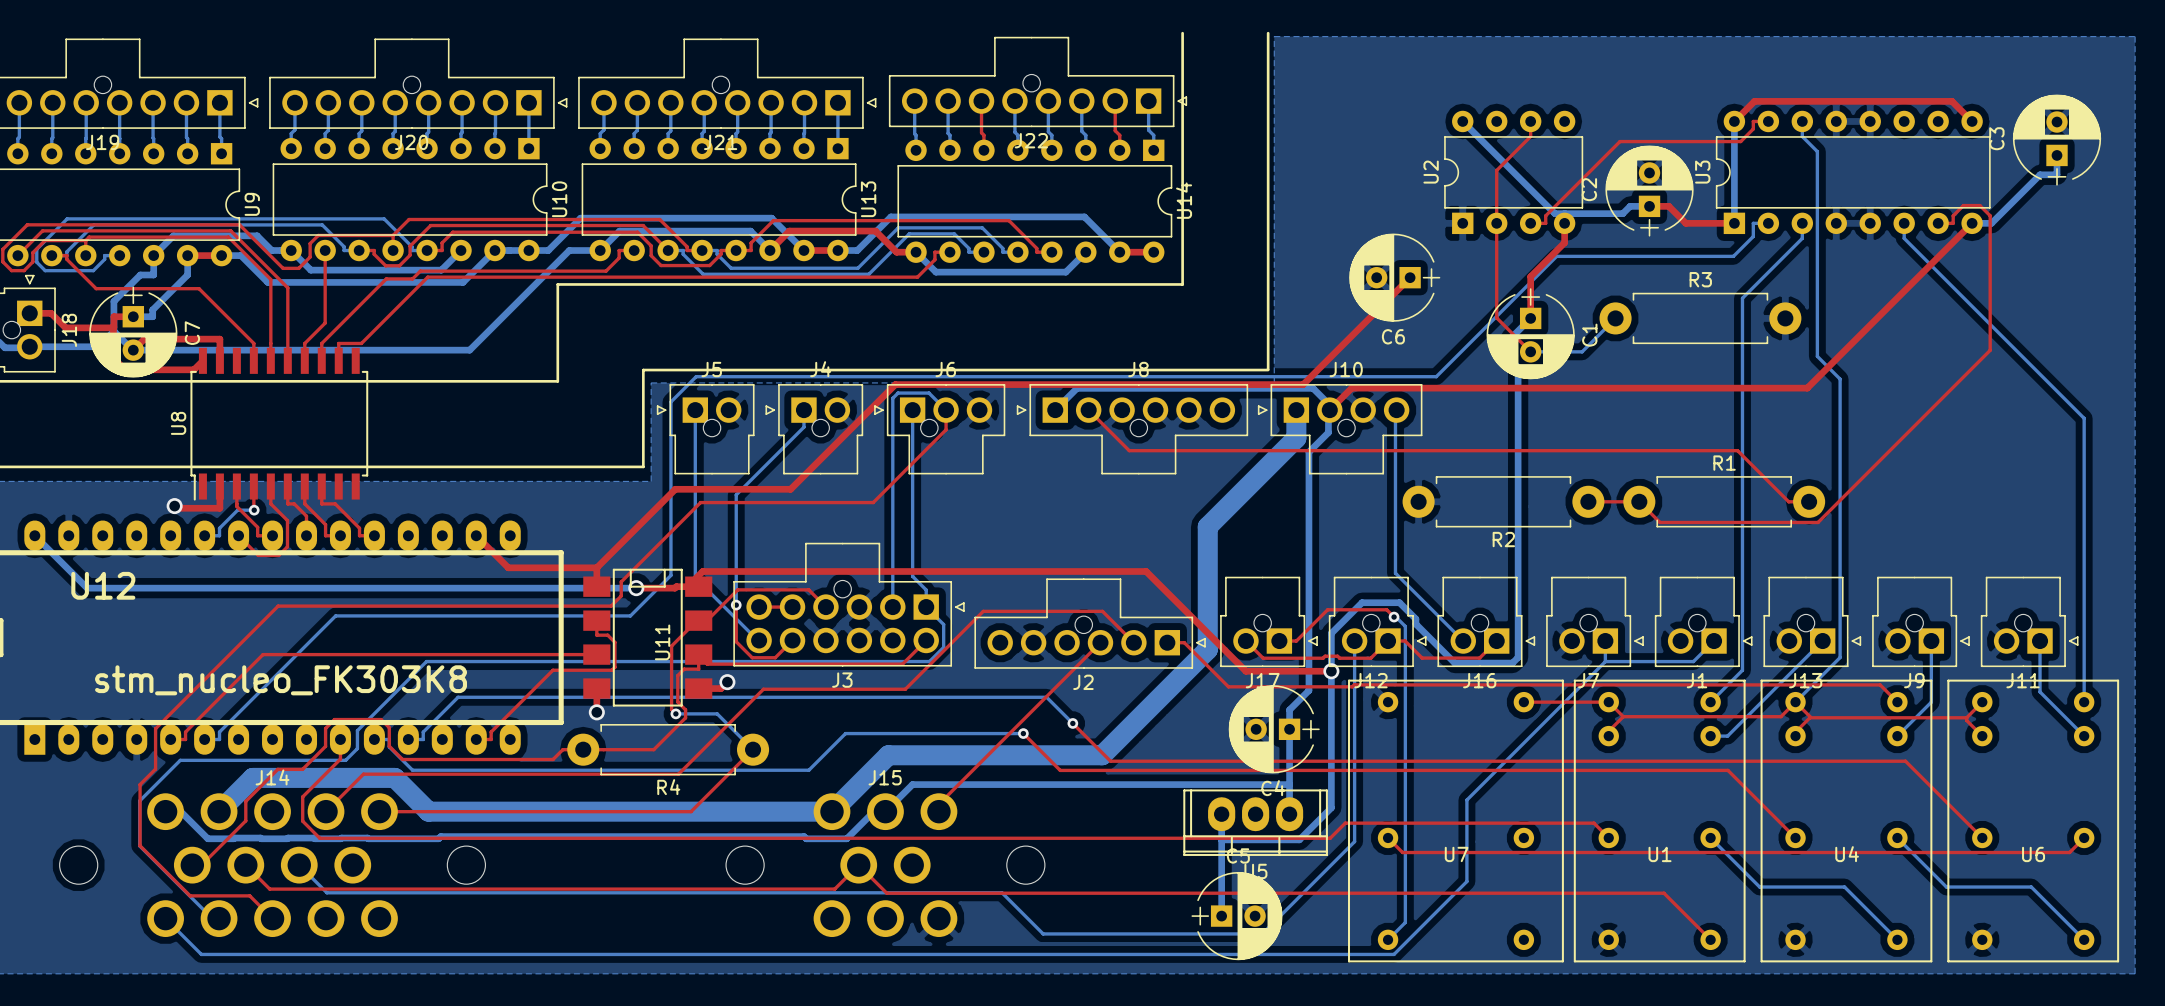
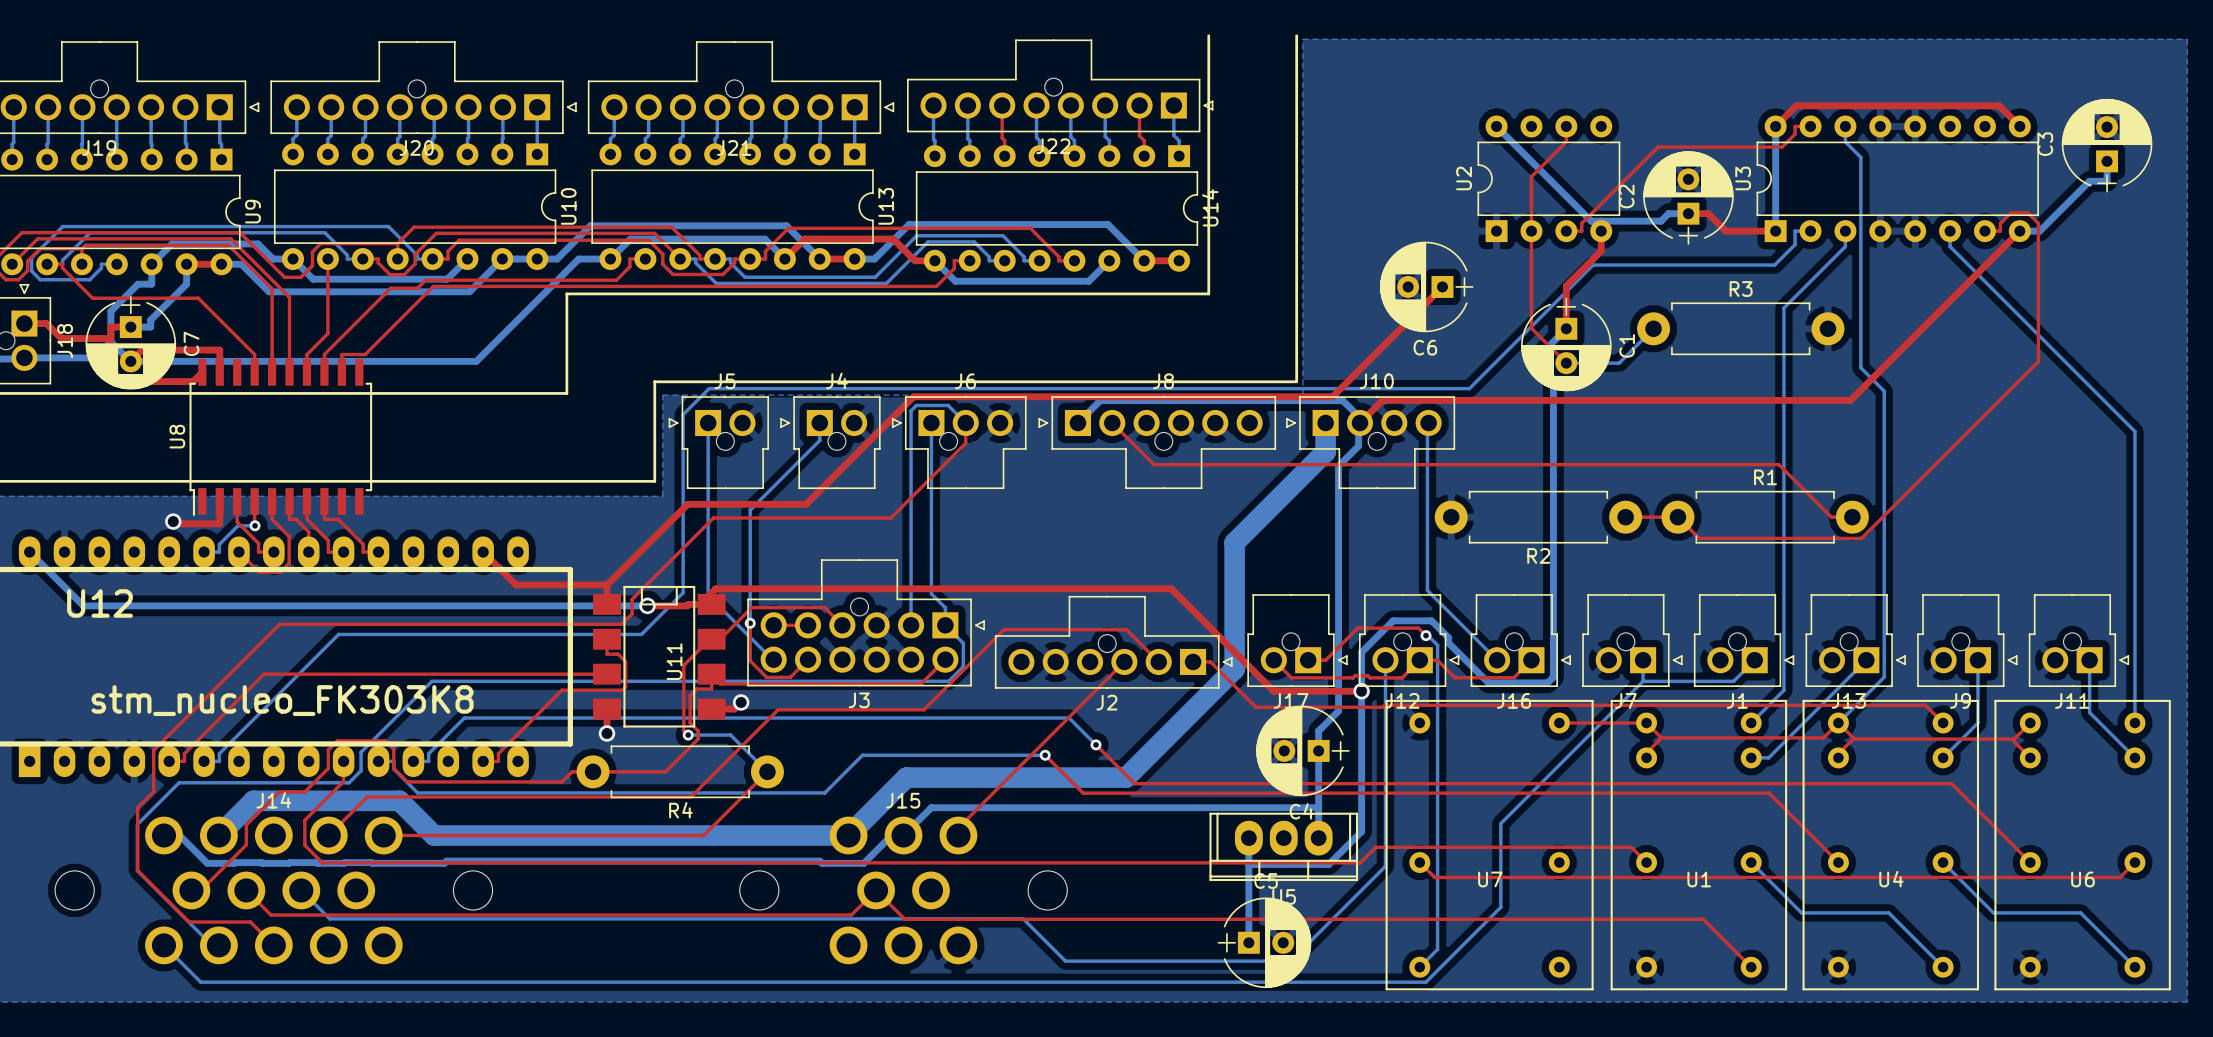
U7 footprint: [1348, 679, 1564, 963] -> [1385, 699, 1594, 991]

